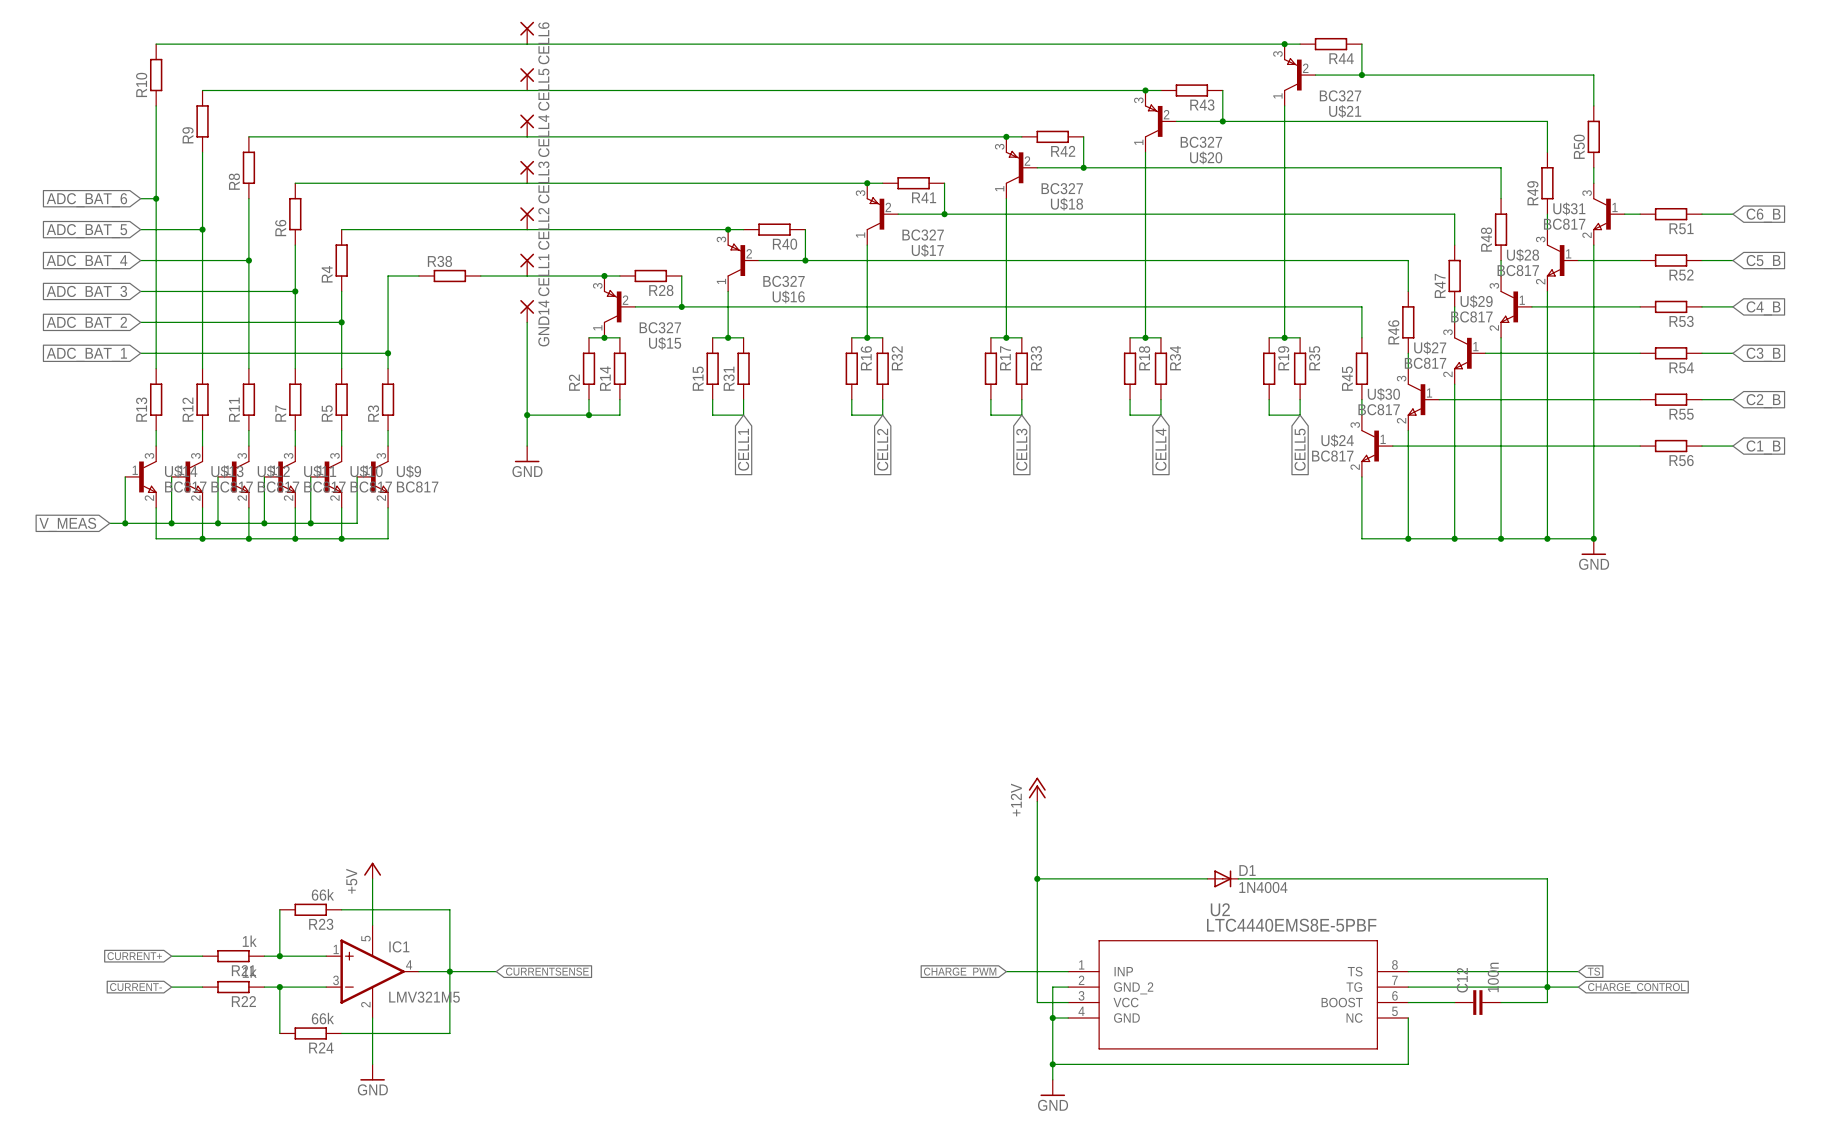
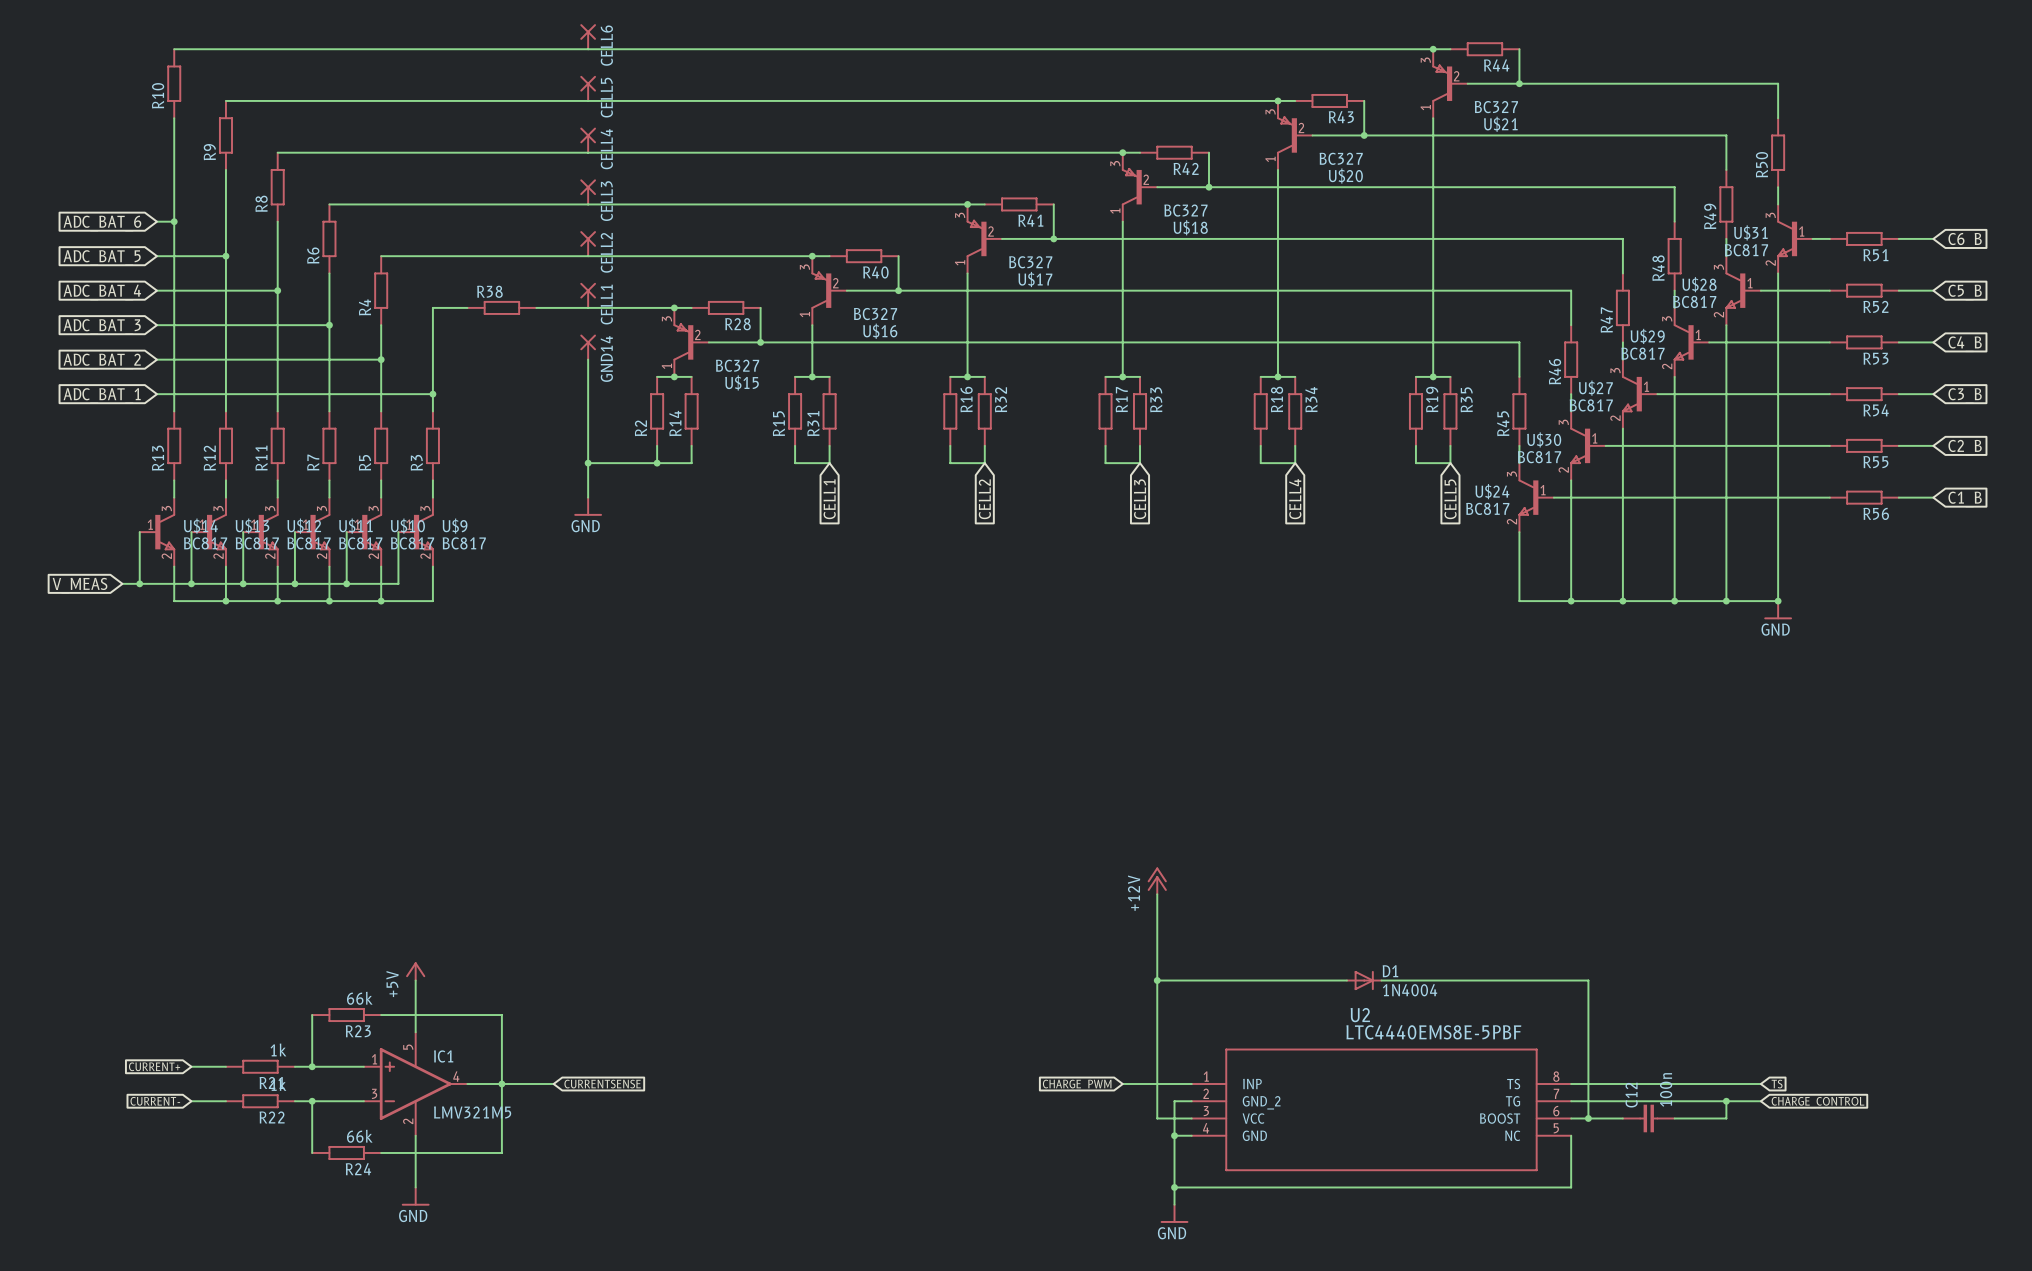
wire: (1423, 878) (1547, 878) (1547, 987) -> (1588, 980) (1588, 1118)
junction: none -> (1588, 1118)

